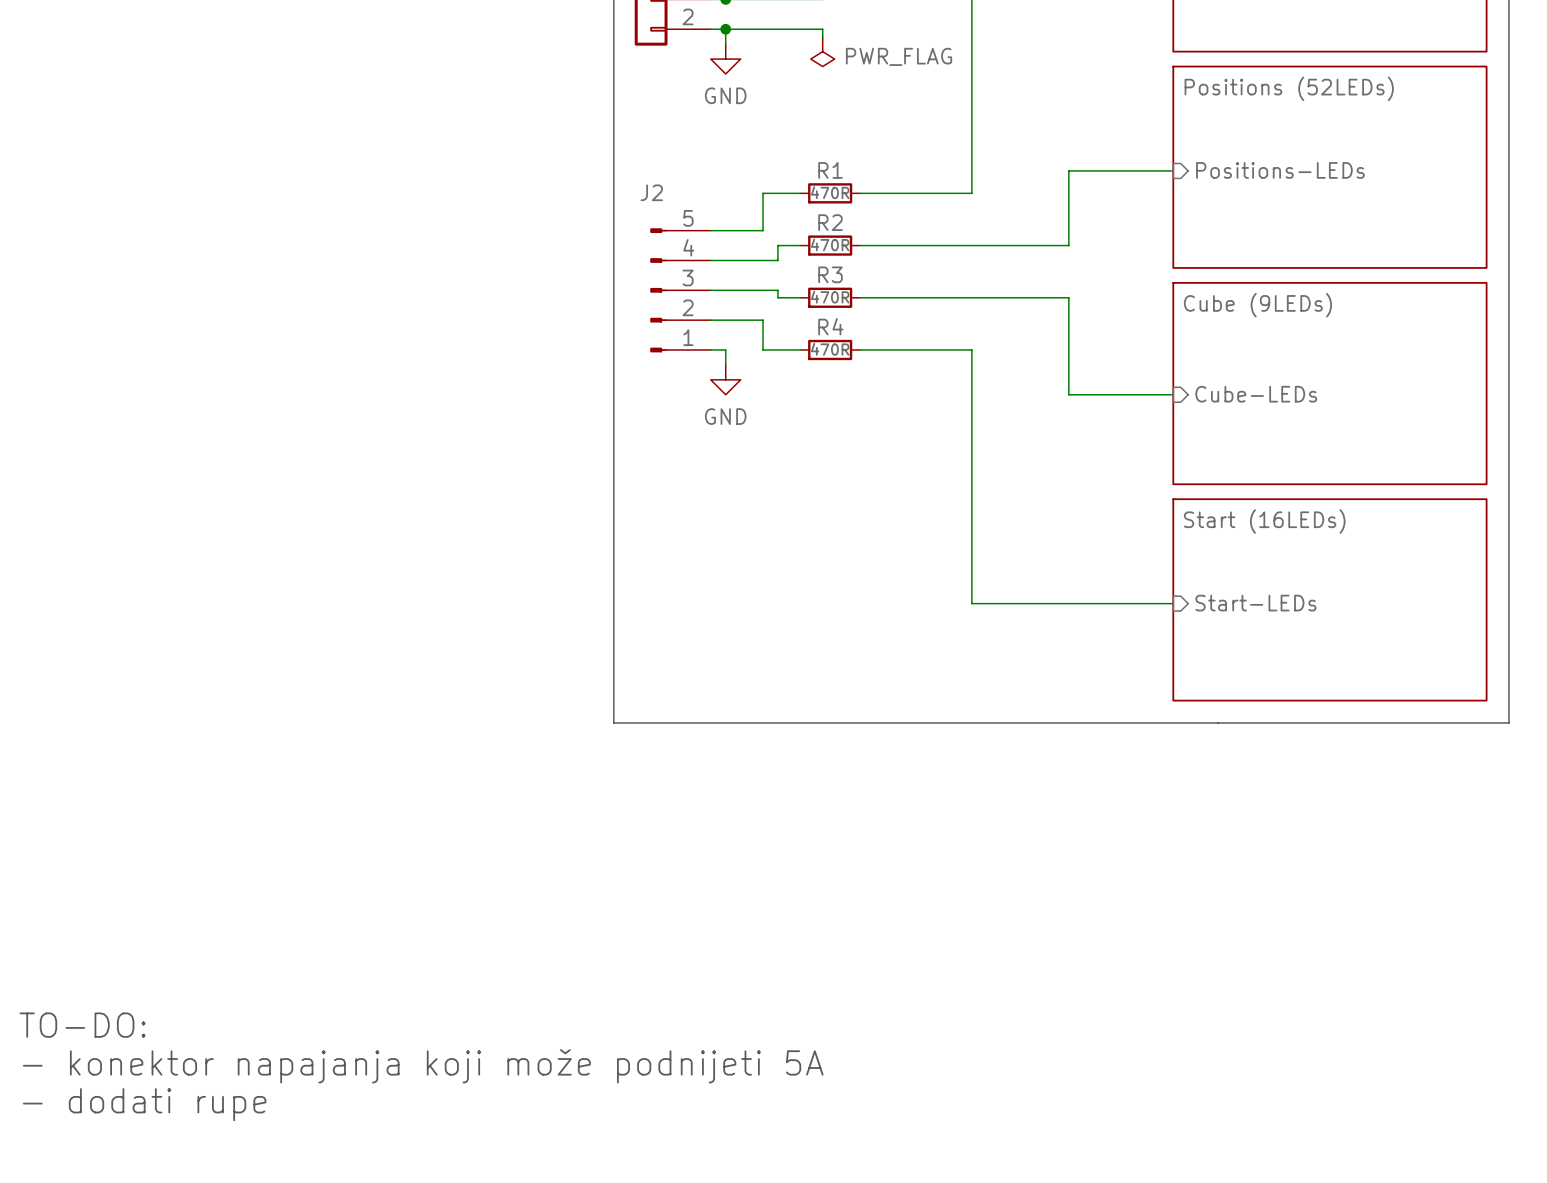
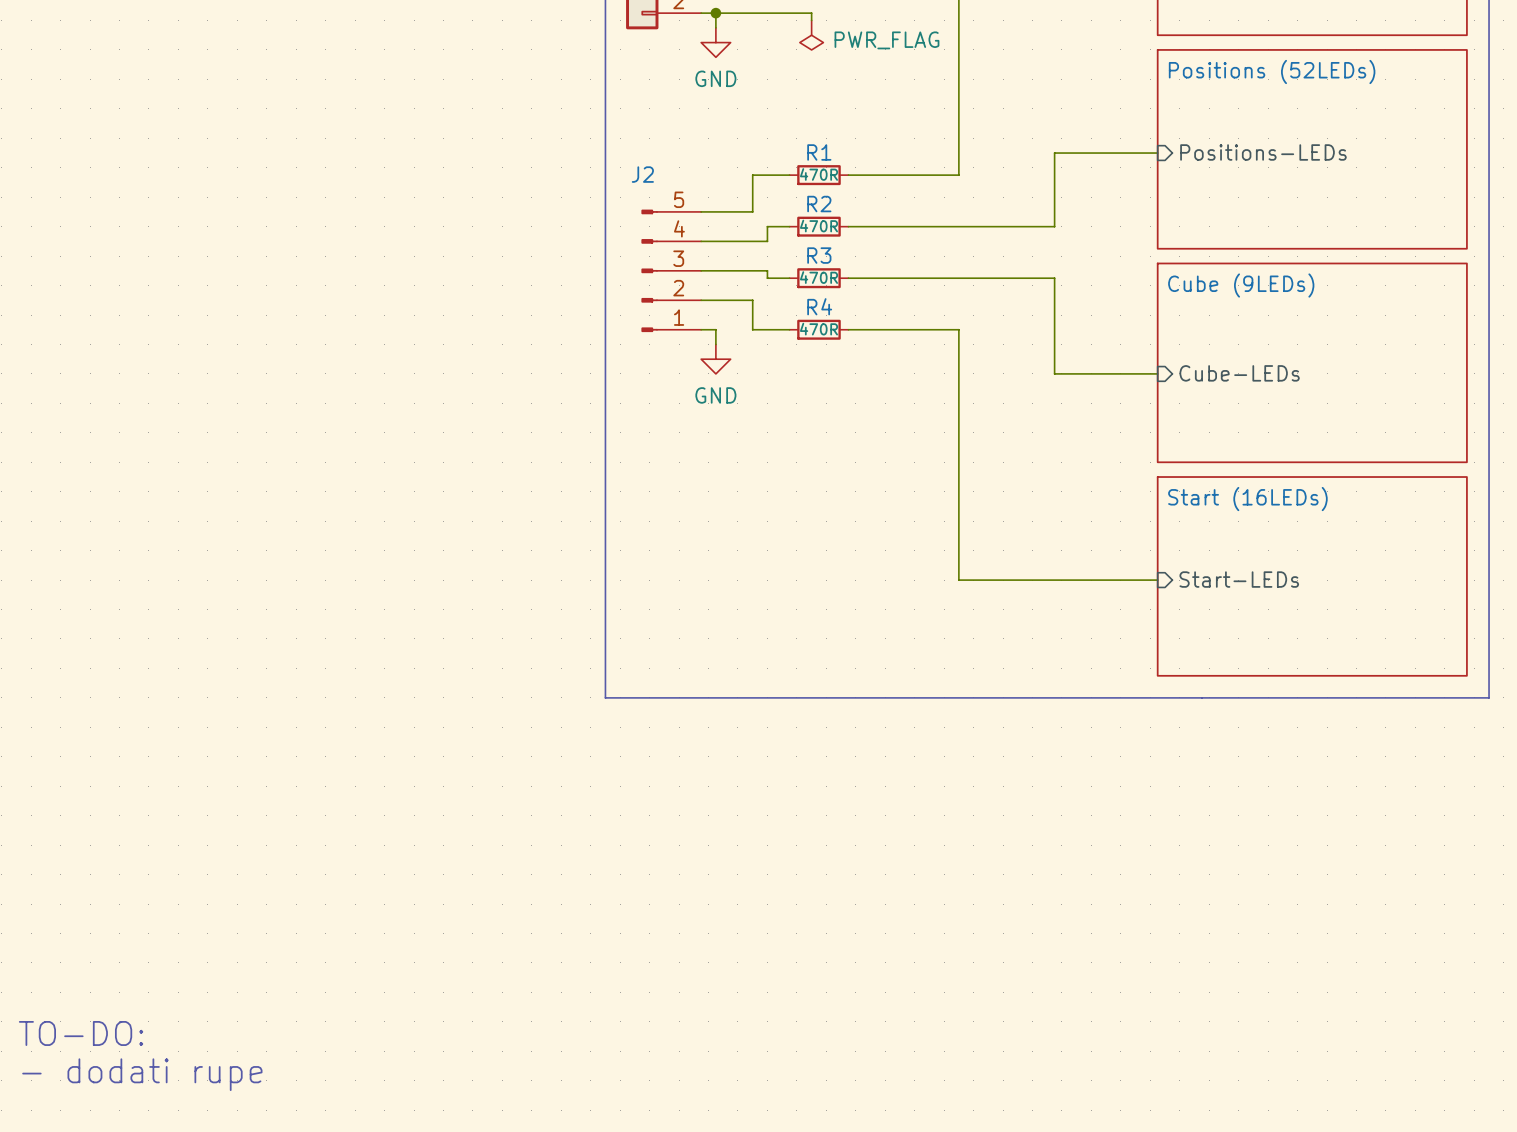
text: TO-DO: (82, 1025) -> none
text: - konektor napajanja koji može podnijeti 5A (423, 1066) -> TO-DO: (81, 1033)

